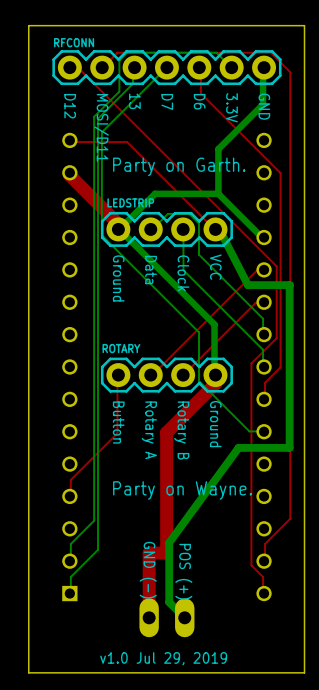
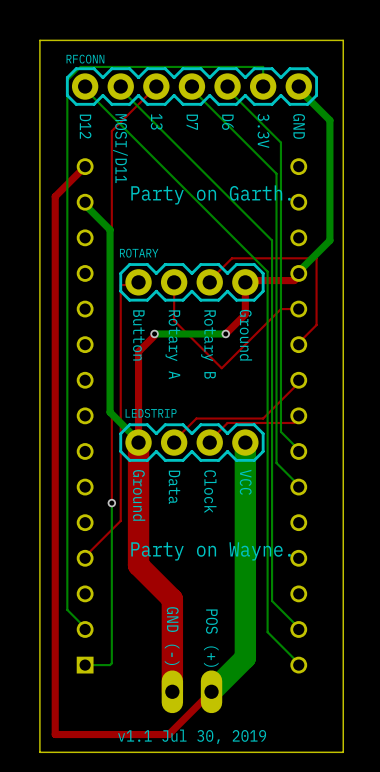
top track: (69, 67) (78, 68) (276, 266) (276, 338) (251, 363) (251, 565) (263, 577) (264, 593) -> none
bottom track: none -> (85, 86) (85, 89) (267, 271) (267, 632) (298, 665)
top track: (102, 67) (117, 52) (270, 52) (290, 72) (290, 518) (265, 544) (264, 561) -> none
bottom track: none -> (120, 86) (120, 89) (272, 240) (272, 601) (298, 629)
top track: none -> (156, 86) (111, 131) (111, 503)
bottom track: (134, 67) (132, 68) (132, 83) (98, 118) (98, 549) (70, 577) (69, 593) -> none
bottom track: (166, 67) (101, 132) (101, 235) (198, 332) (198, 380) (249, 431) (264, 431) -> (191, 86) (191, 89) (276, 173) (276, 463) (298, 487)
top track: (199, 67) (200, 68) (200, 93) (280, 173) (280, 367) (265, 382) (264, 399) -> none
bottom track: none -> (227, 86) (227, 89) (280, 142) (280, 431) (298, 451)
bottom track: (231, 67) (216, 52) (127, 52) (119, 60) (119, 91) (94, 116) (94, 446) -> (263, 86) (263, 66) (80, 66) (67, 80) (67, 609) (85, 629)
bottom track: (264, 67) (263, 104) (218, 149) (218, 193) -> (298, 86) (298, 89) (329, 120) (329, 240) (298, 273)
top track: (69, 140) (70, 142) (127, 142) (215, 229) -> (85, 166) (55, 196) (55, 734) (168, 734) (211, 691)
top track: (69, 172) (69, 174) (118, 223) (118, 229) -> none
bottom track: none -> (85, 202) (85, 204) (110, 229) (110, 412) (138, 442)
bottom track: (218, 193) (264, 237) -> none
bottom track: (218, 193) (154, 193) (119, 229) -> none
bottom track: (119, 229) (214, 324) (215, 375) -> none
bottom track: (150, 229) (167, 213) (189, 213) (198, 223) (198, 254) (263, 318) (264, 334) -> none
LEDSTRIP position: (166, 229) -> (191, 442)
bottom track: (183, 229) (183, 270) (263, 349) (264, 366) -> none
bottom track: (215, 229) (223, 237) (247, 285) (289, 285) (289, 447) (238, 447) (169, 542) (169, 602) (184, 617) -> (245, 442) (245, 657) (211, 691)
top track: none -> (298, 273) (294, 280) (245, 280) (245, 314) (225, 333)
text position: VCC (215, 267) -> VCC (245, 482)
top track: (264, 269) (257, 270) (150, 375) -> (298, 309) (280, 309) (221, 368) (174, 320) (174, 282)
text position: Data (151, 270) -> Data (174, 487)
text position: Clock (183, 273) -> Clock (210, 491)
text: Ground (118, 278) -> none
via: none -> (154, 333)
bottom track: none -> (225, 333) (154, 333)
via: none -> (225, 333)
text: none -> Ground (245, 335)
top track: (264, 302) (255, 303) (183, 375) -> (298, 344) (316, 325) (316, 258) (232, 258) (209, 282)
top track: none -> (298, 380) (298, 382) (263, 418) (196, 418) (174, 442)
top track: none -> (298, 415) (294, 422) (227, 422) (209, 442)
top track: (118, 375) (117, 433) (70, 479) (69, 496) -> (138, 282) (138, 285) (120, 285) (120, 520) (85, 558)
ROTARY position: (166, 375) -> (191, 282)
top track: (215, 375) (215, 383) (166, 432) (166, 553) (149, 553) -> (154, 333) (138, 351) (138, 565) (172, 599) (172, 620)
text position: Button (118, 422) -> Button (138, 335)
text: Ground (215, 424) -> none
text position: Rotary A (149, 430) -> Rotary A (172, 344)
text position: Rotary B (181, 430) -> Rotary B (208, 344)
text: none -> Ground (139, 495)
via: none -> (111, 503)
bottom track: (94, 520) (70, 544) (69, 561) -> (111, 584) (111, 663) (110, 665) (85, 665)
top track width: thin (149, 553) (149, 617) -> thick (172, 620) (172, 691)
text: v1.0 Jul 29, 2019 (163, 658) -> v1.1 Jul 30, 2019 (192, 736)

